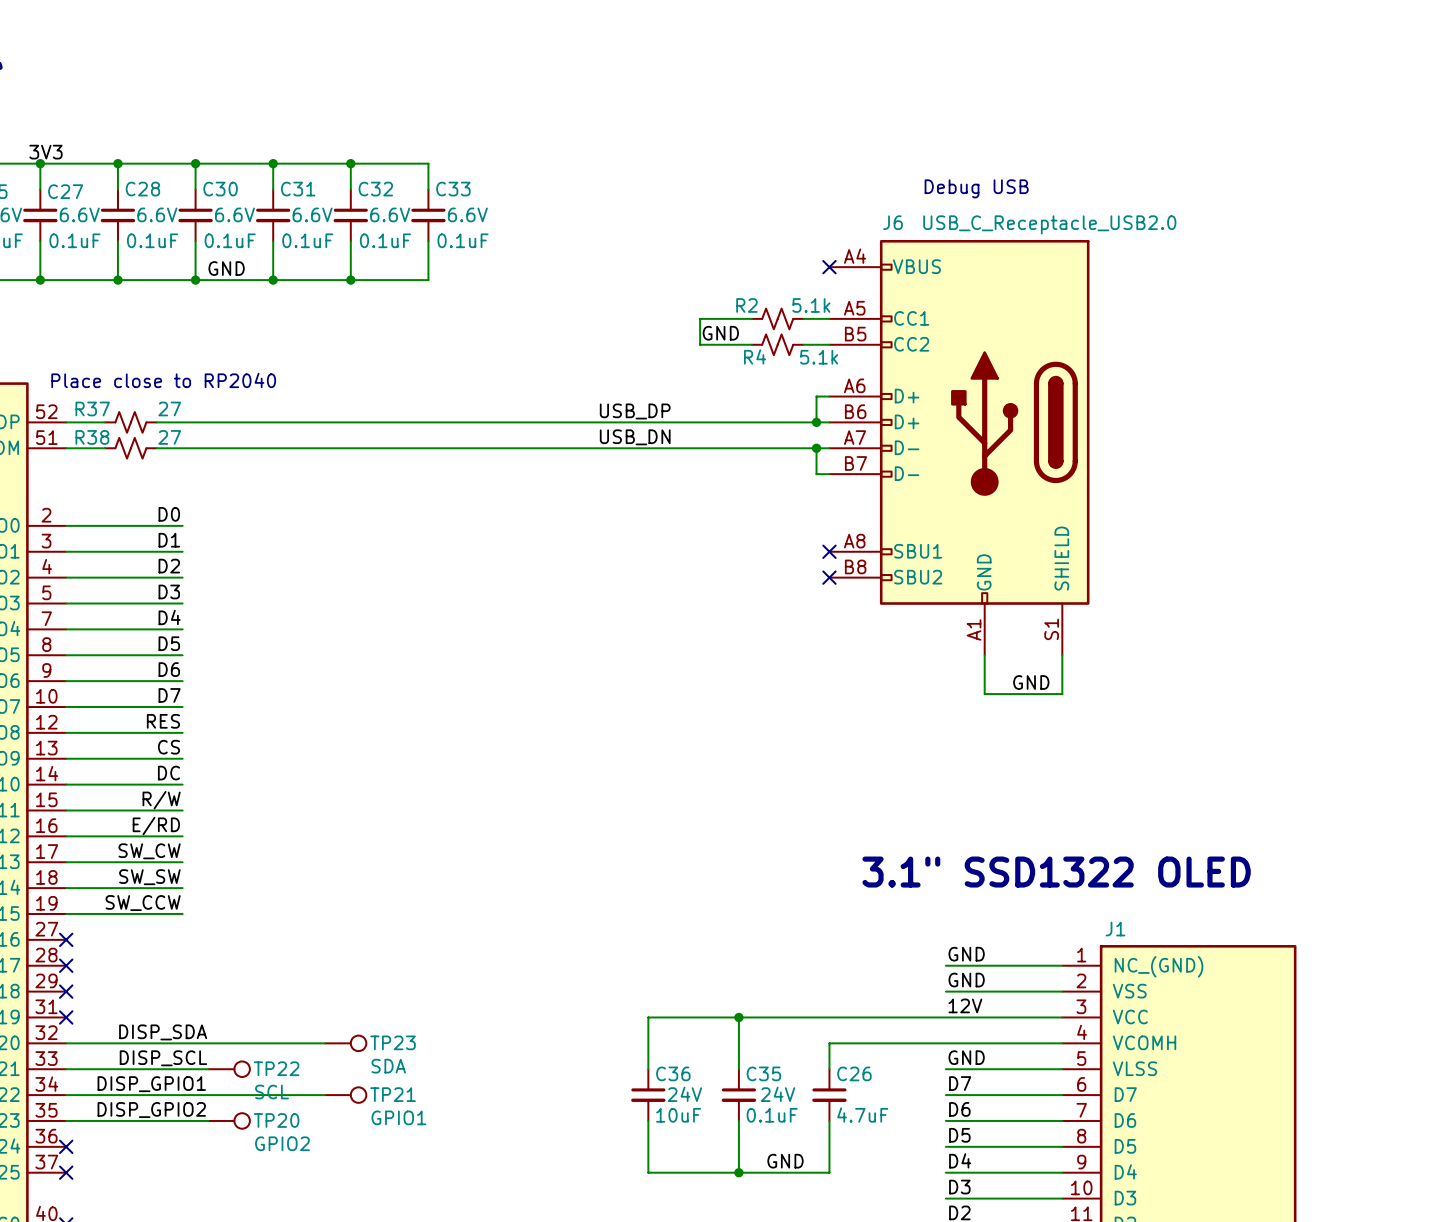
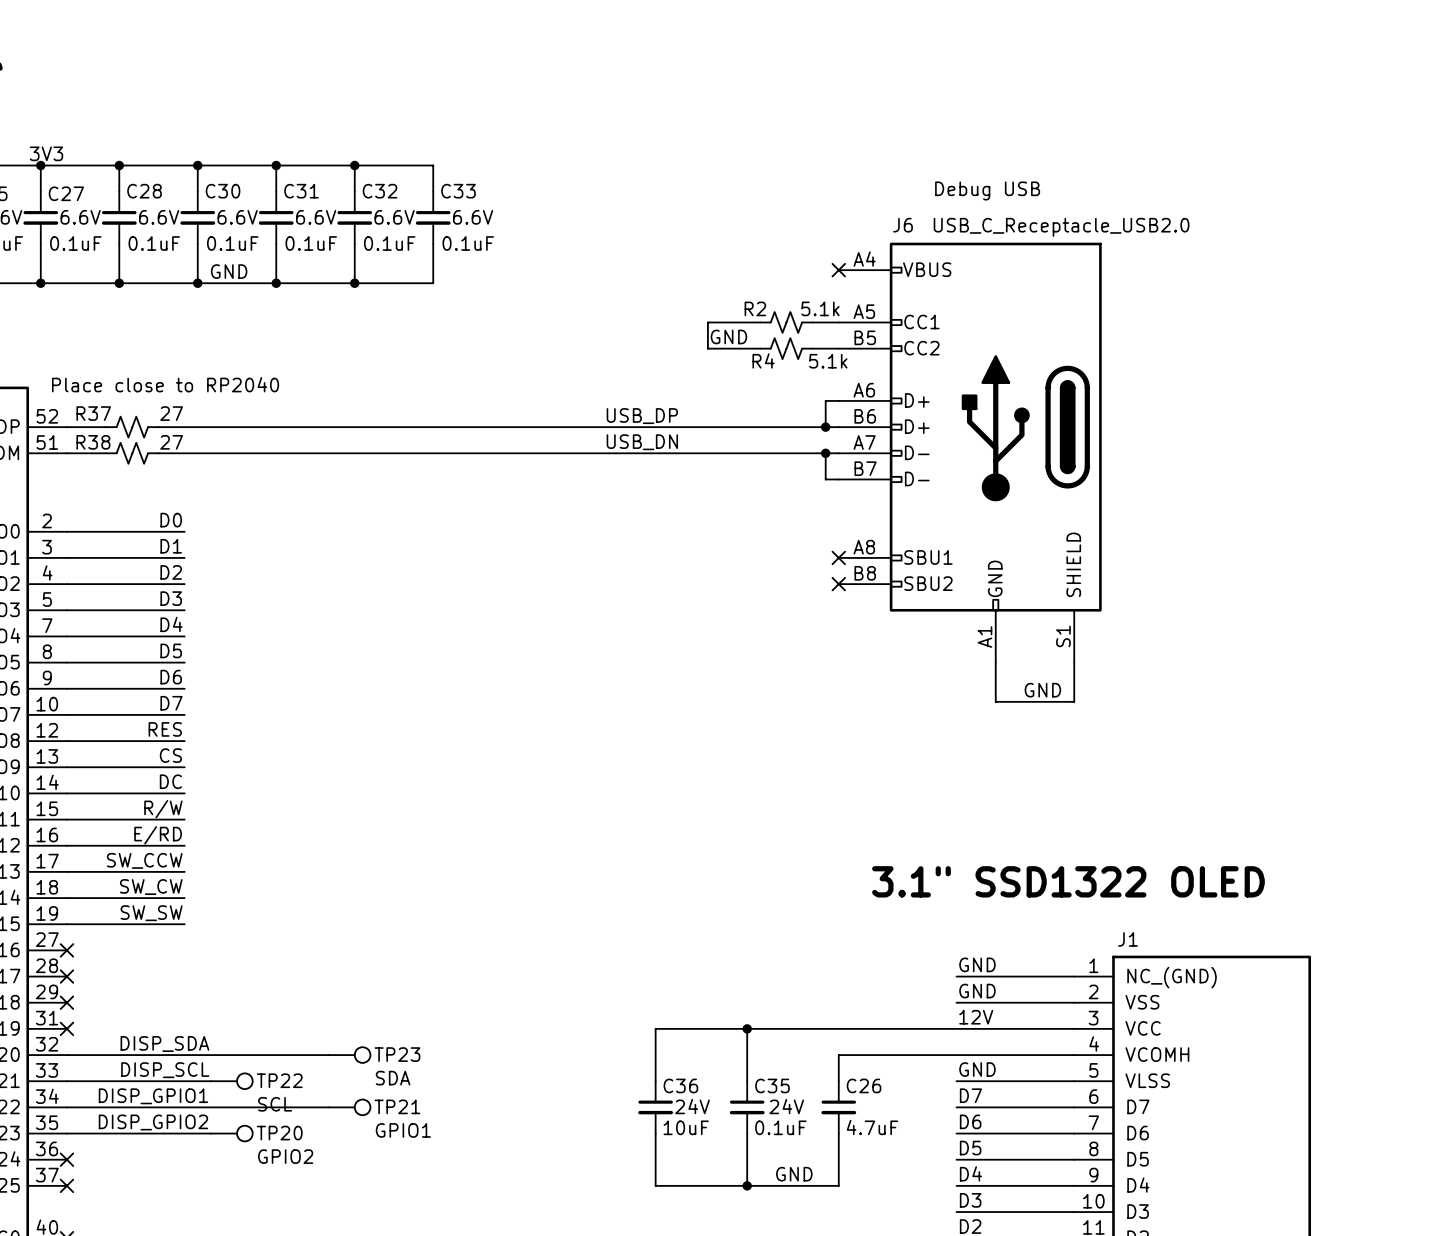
label: SW_CW (149, 851) -> SW_CCW (144, 860)
label: SW_SW (149, 877) -> SW_CW (151, 887)
label: SW_CCW (143, 903) -> SW_SW (151, 913)

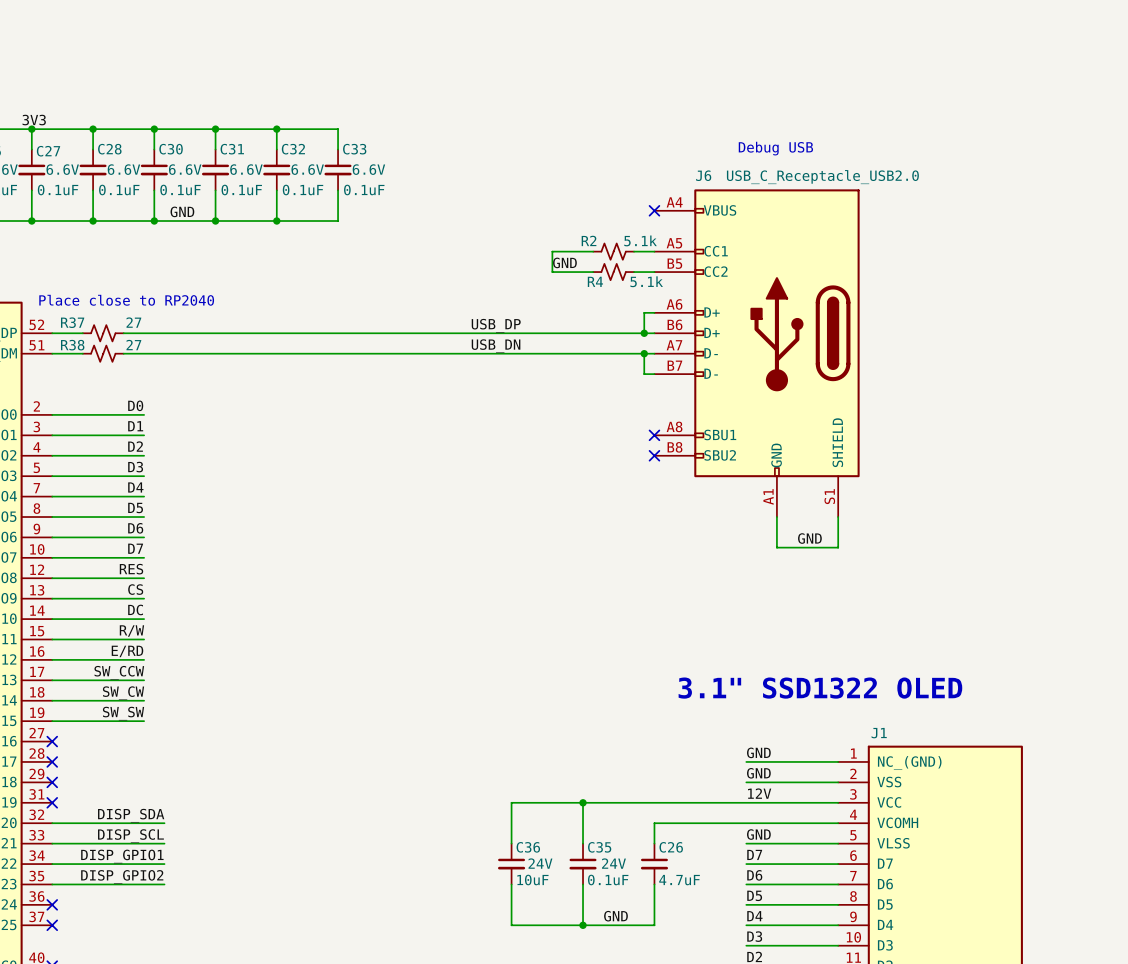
wire: (210, 1055) (328, 1055) -> none
TP23: SDA (349, 1055) -> none
TP22: SCL (231, 1081) -> none
wire: (210, 1107) (328, 1107) -> none
TP21: GPIO1 (349, 1107) -> none
TP20: GPIO2 (231, 1133) -> none

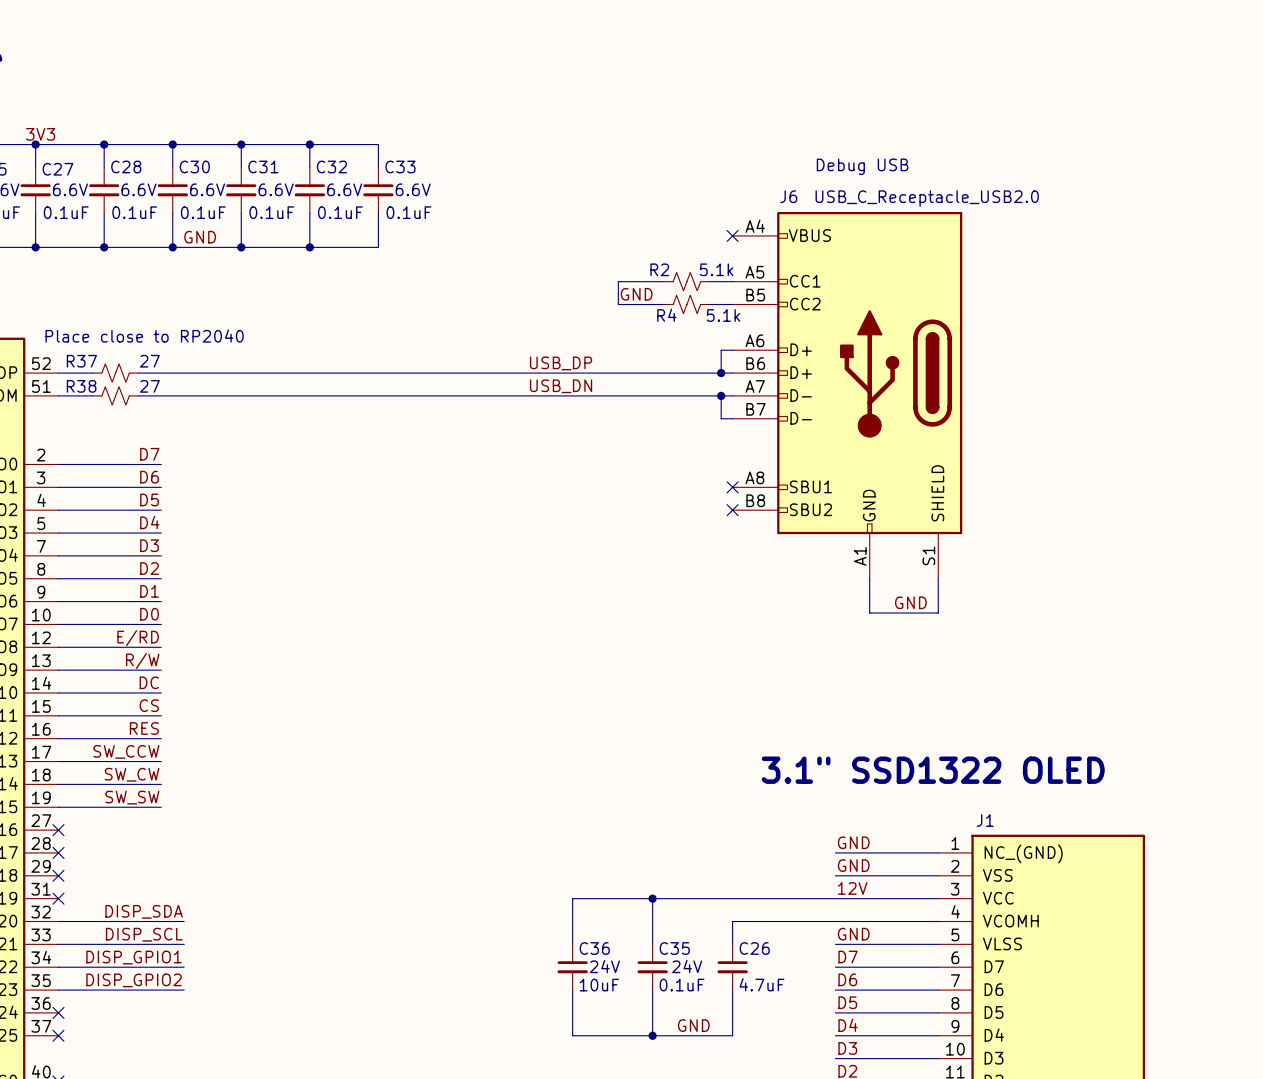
label: D0 (135, 405) -> D7 (149, 454)
label: D1 (135, 426) -> D6 (149, 477)
label: D2 (135, 446) -> D5 (149, 499)
label: D3 (135, 467) -> D4 (149, 522)
label: D4 (135, 487) -> D3 (149, 545)
label: D5 (135, 507) -> D2 (149, 568)
label: D6 (135, 528) -> D1 (149, 591)
label: D7 (135, 548) -> D0 (149, 614)
label: RES (131, 569) -> E/RD (138, 638)
label: CS (135, 589) -> R/W (142, 661)
label: R/W (131, 631) -> CS (149, 705)
label: E/RD (127, 651) -> RES (144, 728)

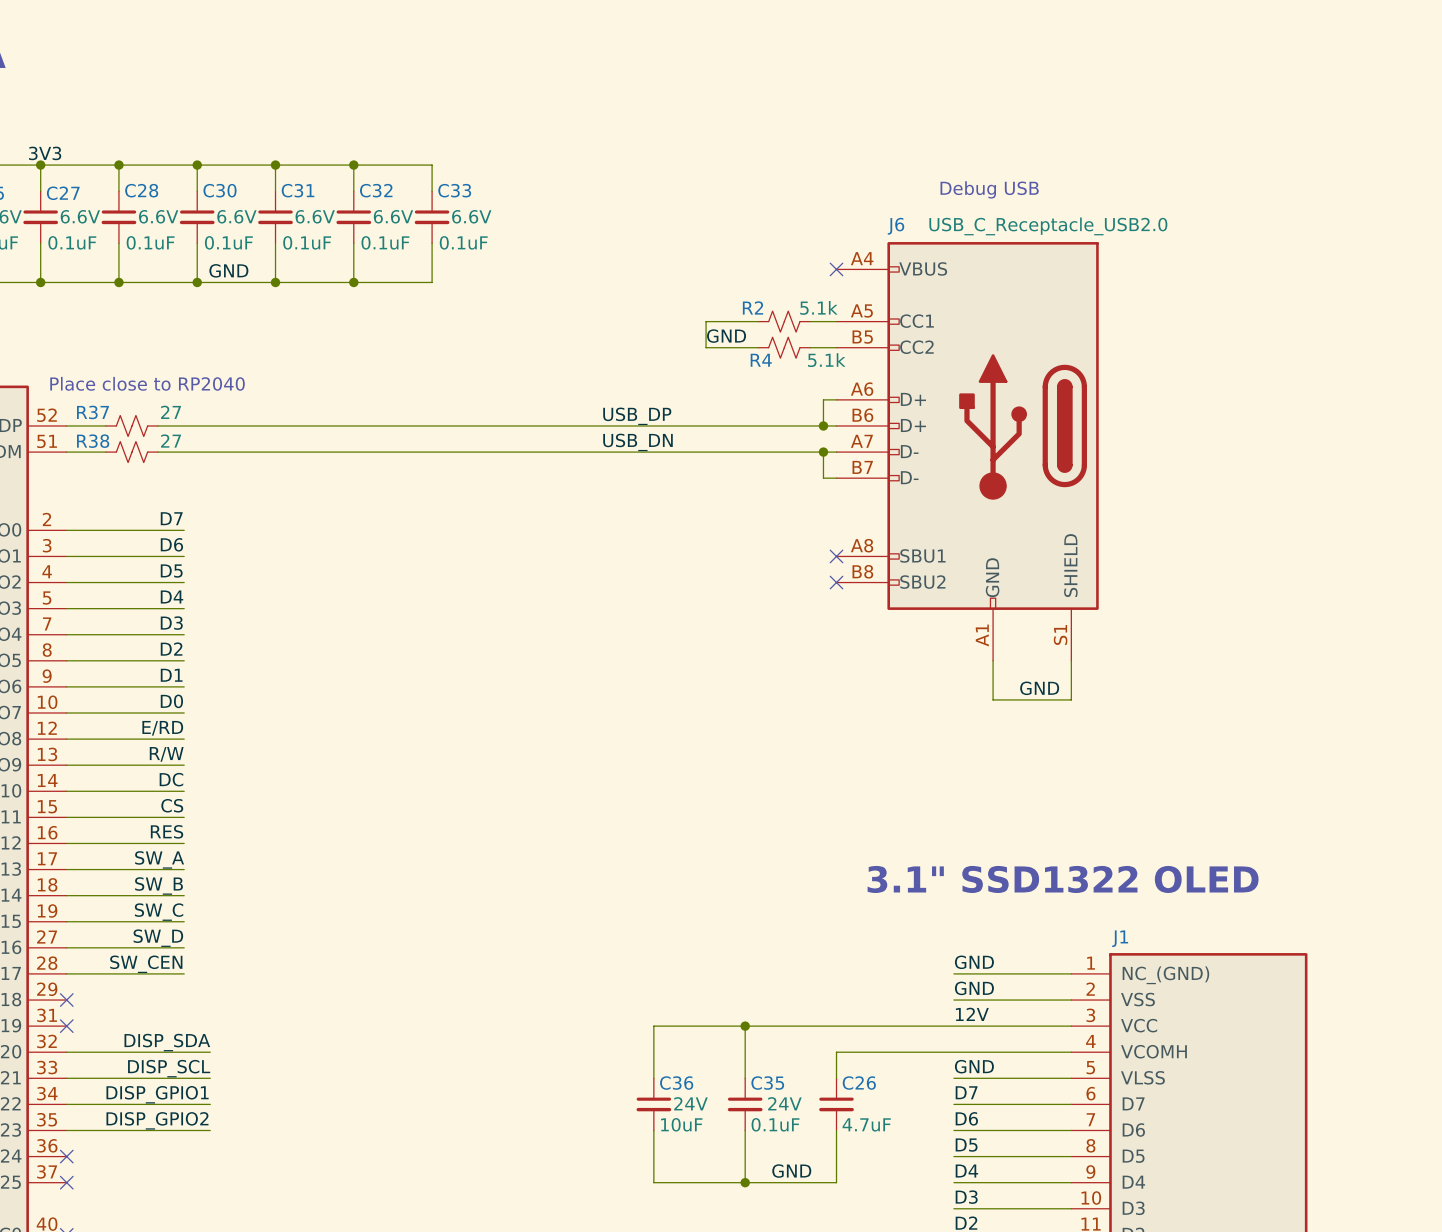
label: SW_CCW (126, 751) -> SW_A (159, 859)
label: SW_CW (132, 774) -> SW_B (159, 886)
label: SW_SW (132, 797) -> SW_C (159, 912)
label: none -> SW_D (158, 938)
wire: none -> (66, 947) (184, 947)
no-connect mark: (58, 830) -> none
label: none -> SW_CEN (146, 964)
wire: none -> (66, 973) (184, 973)
no-connect mark: (58, 852) -> none

